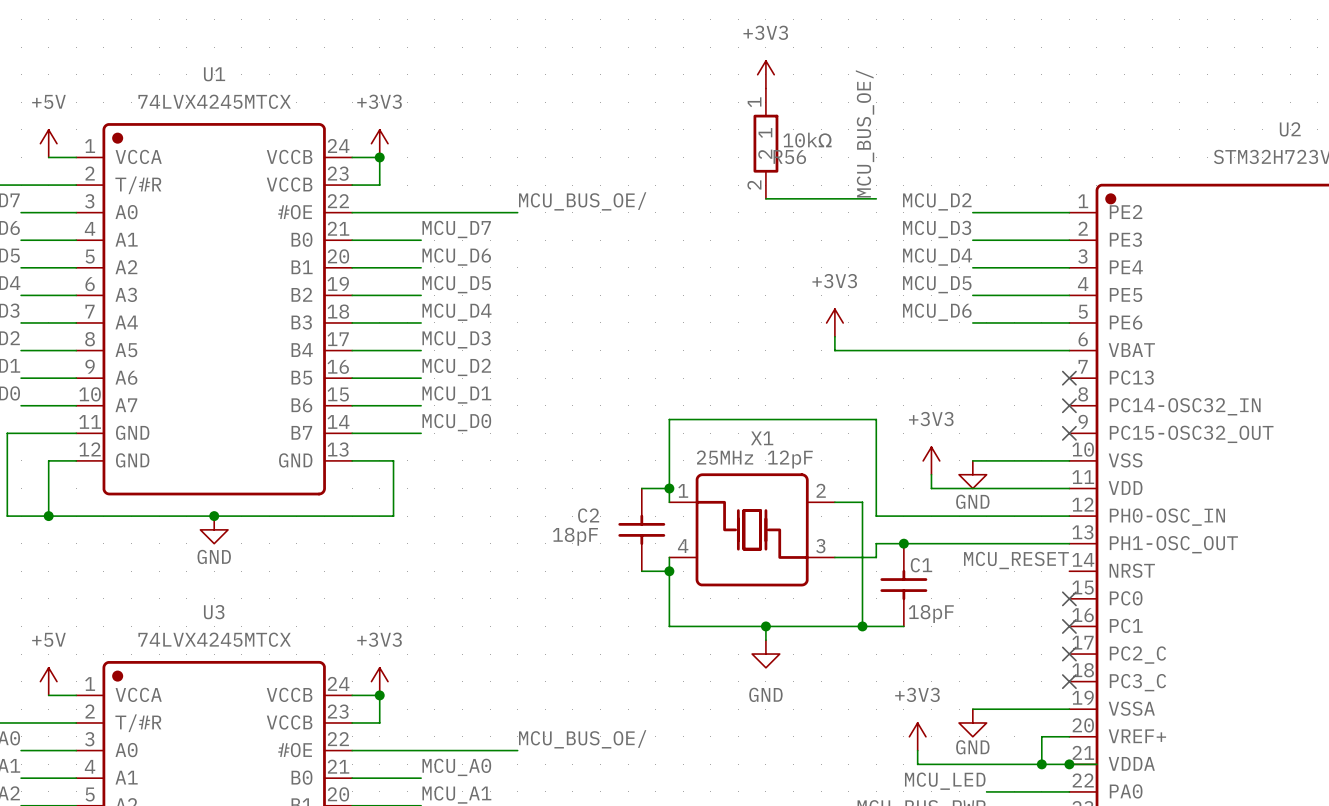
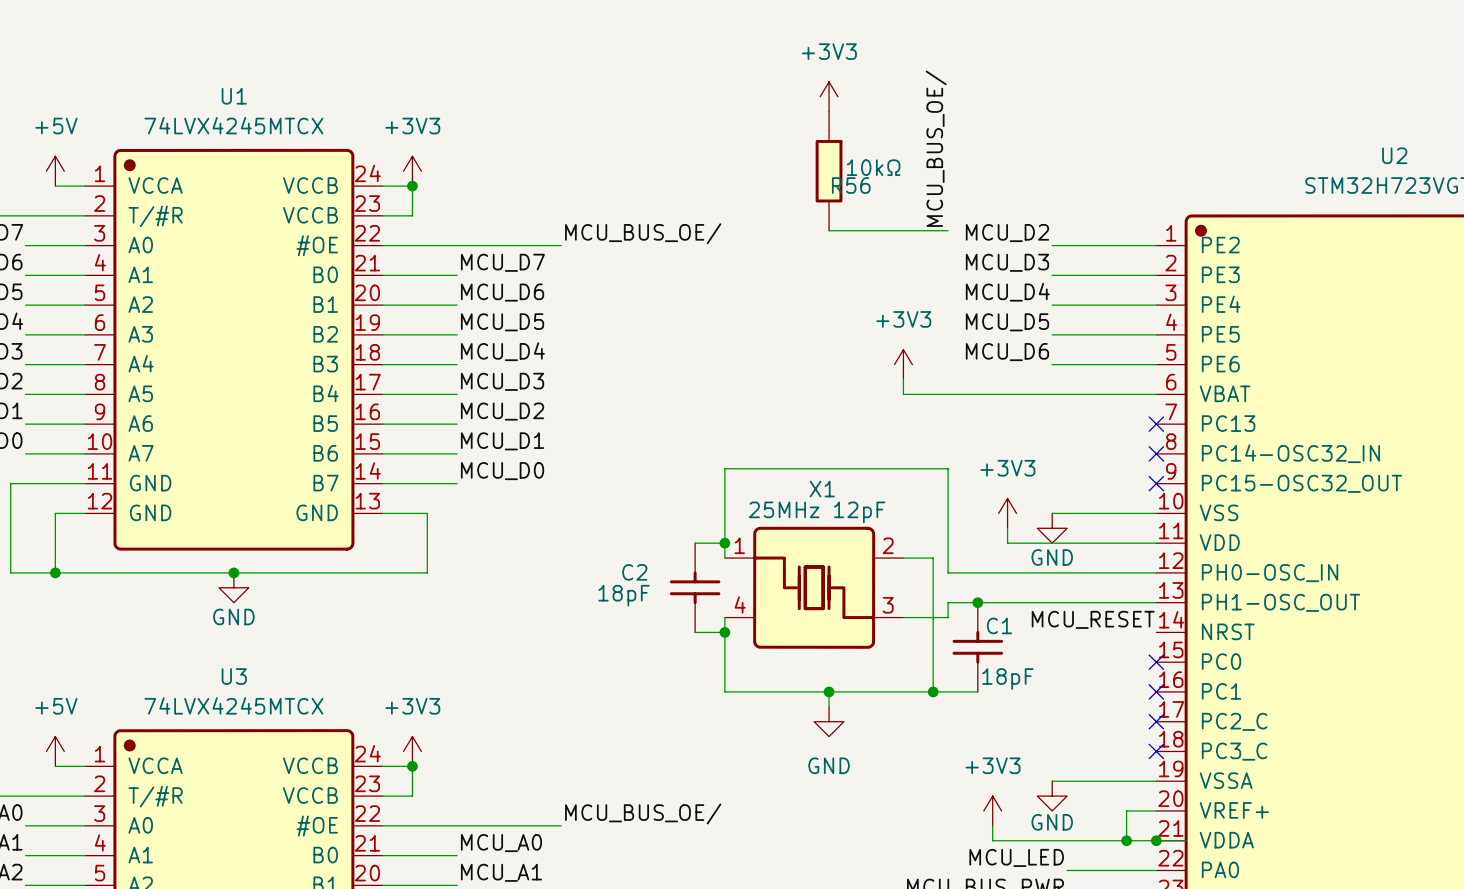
R56 pin number: 1 (754, 102) -> none
R56 pin name: 1 (765, 132) -> none
R56 pin name: 2 (765, 154) -> none
R56 pin number: 2 (754, 185) -> none

